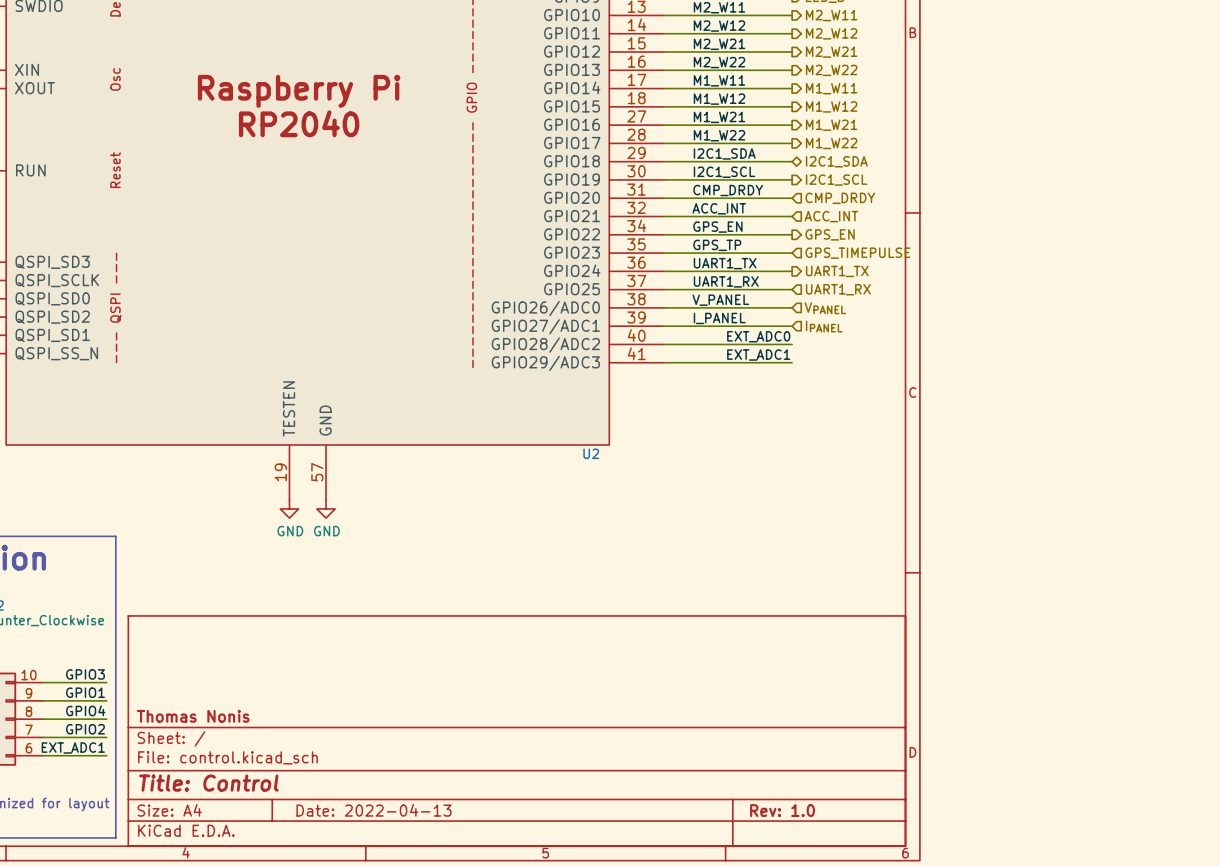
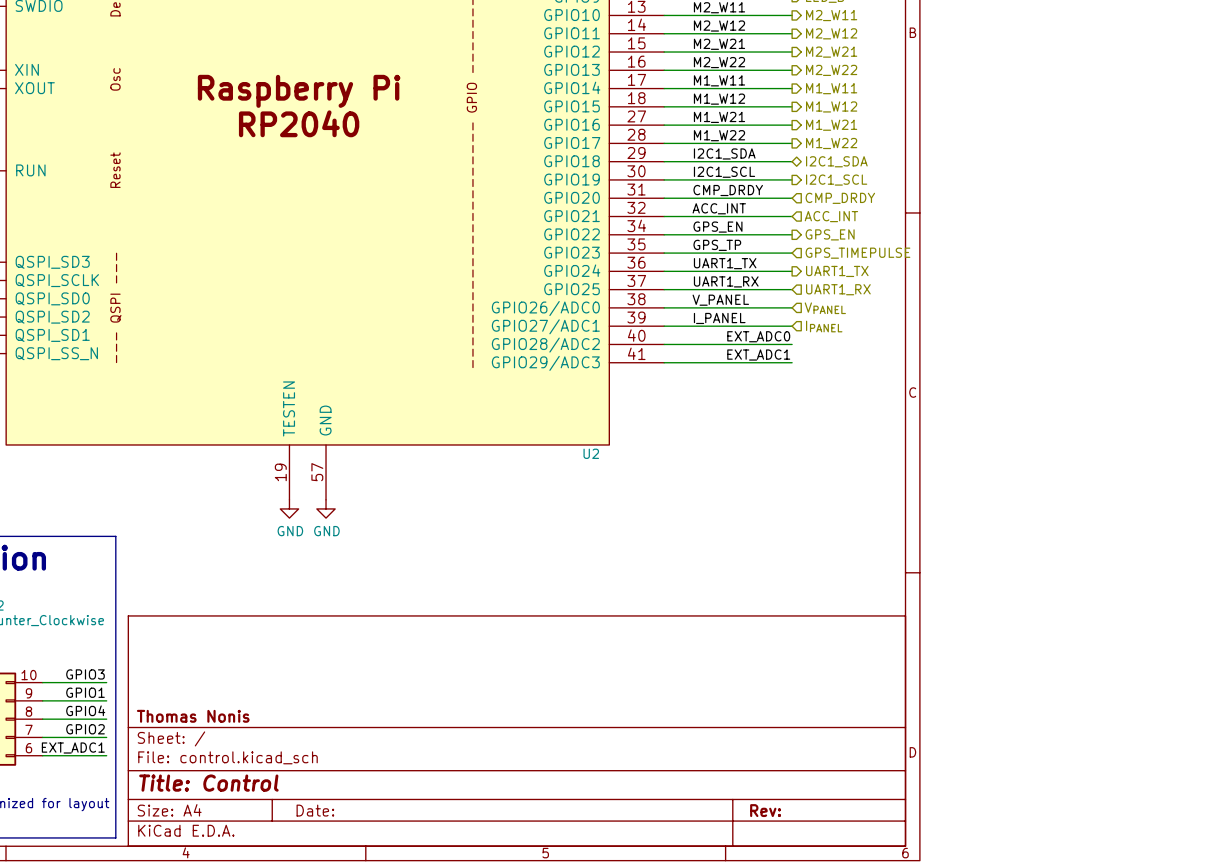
title block: Date: 2022-04-13 (373, 810) -> Date: (315, 810)
title block: Rev: 1.0 (782, 810) -> Rev: (765, 810)

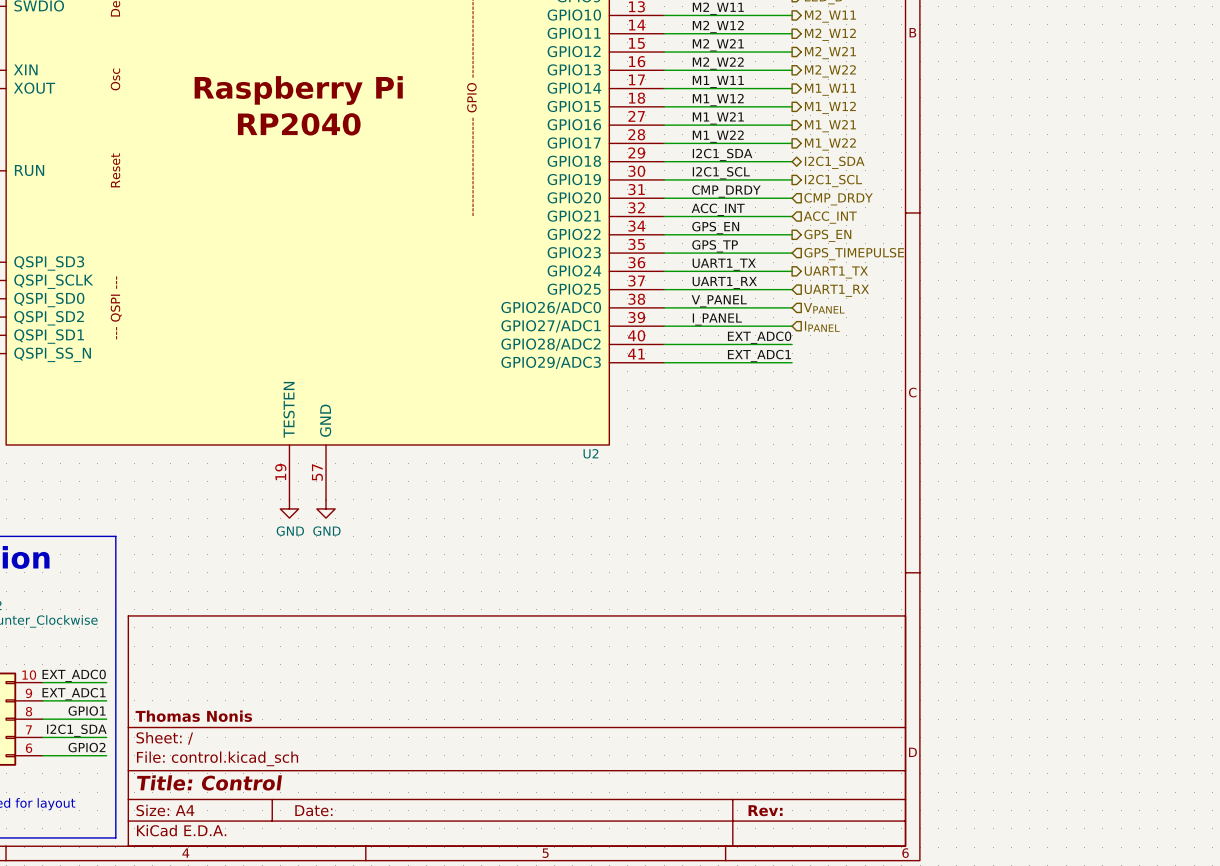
label: GPIO3 (85, 674) -> EXT_ADC0 (74, 675)
label: GPIO1 (85, 692) -> EXT_ADC1 (74, 694)
label: GPIO4 (85, 710) -> GPIO1 (87, 711)
label: GPIO2 (85, 729) -> I2C1_SDA (76, 730)
label: EXT_ADC1 (73, 747) -> GPIO2 (86, 747)

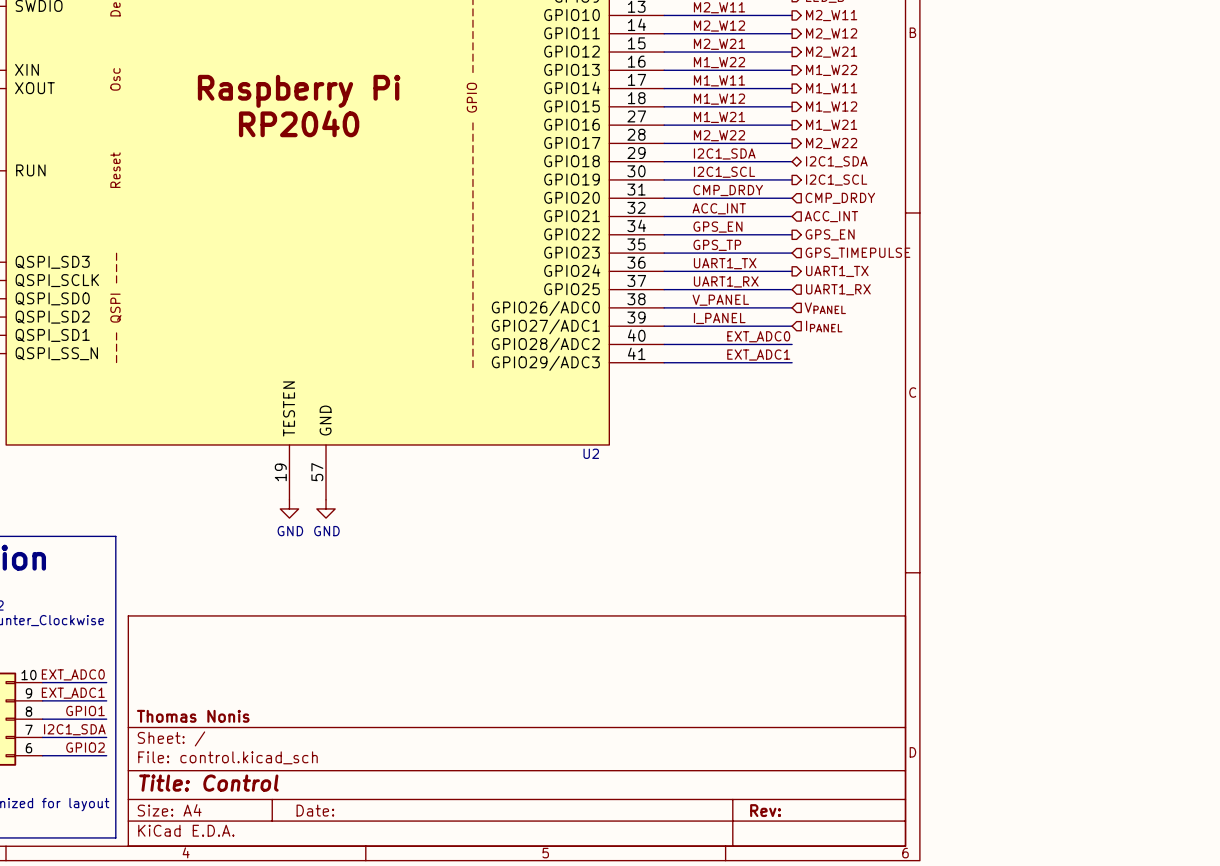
label: M2_W22 (718, 63) -> M1_W22 (719, 62)
hierarchical label: M2_W22 (830, 71) -> M1_W22 (831, 70)
label: M1_W22 (718, 136) -> M2_W22 (719, 135)
hierarchical label: M1_W22 (830, 144) -> M2_W22 (831, 143)

